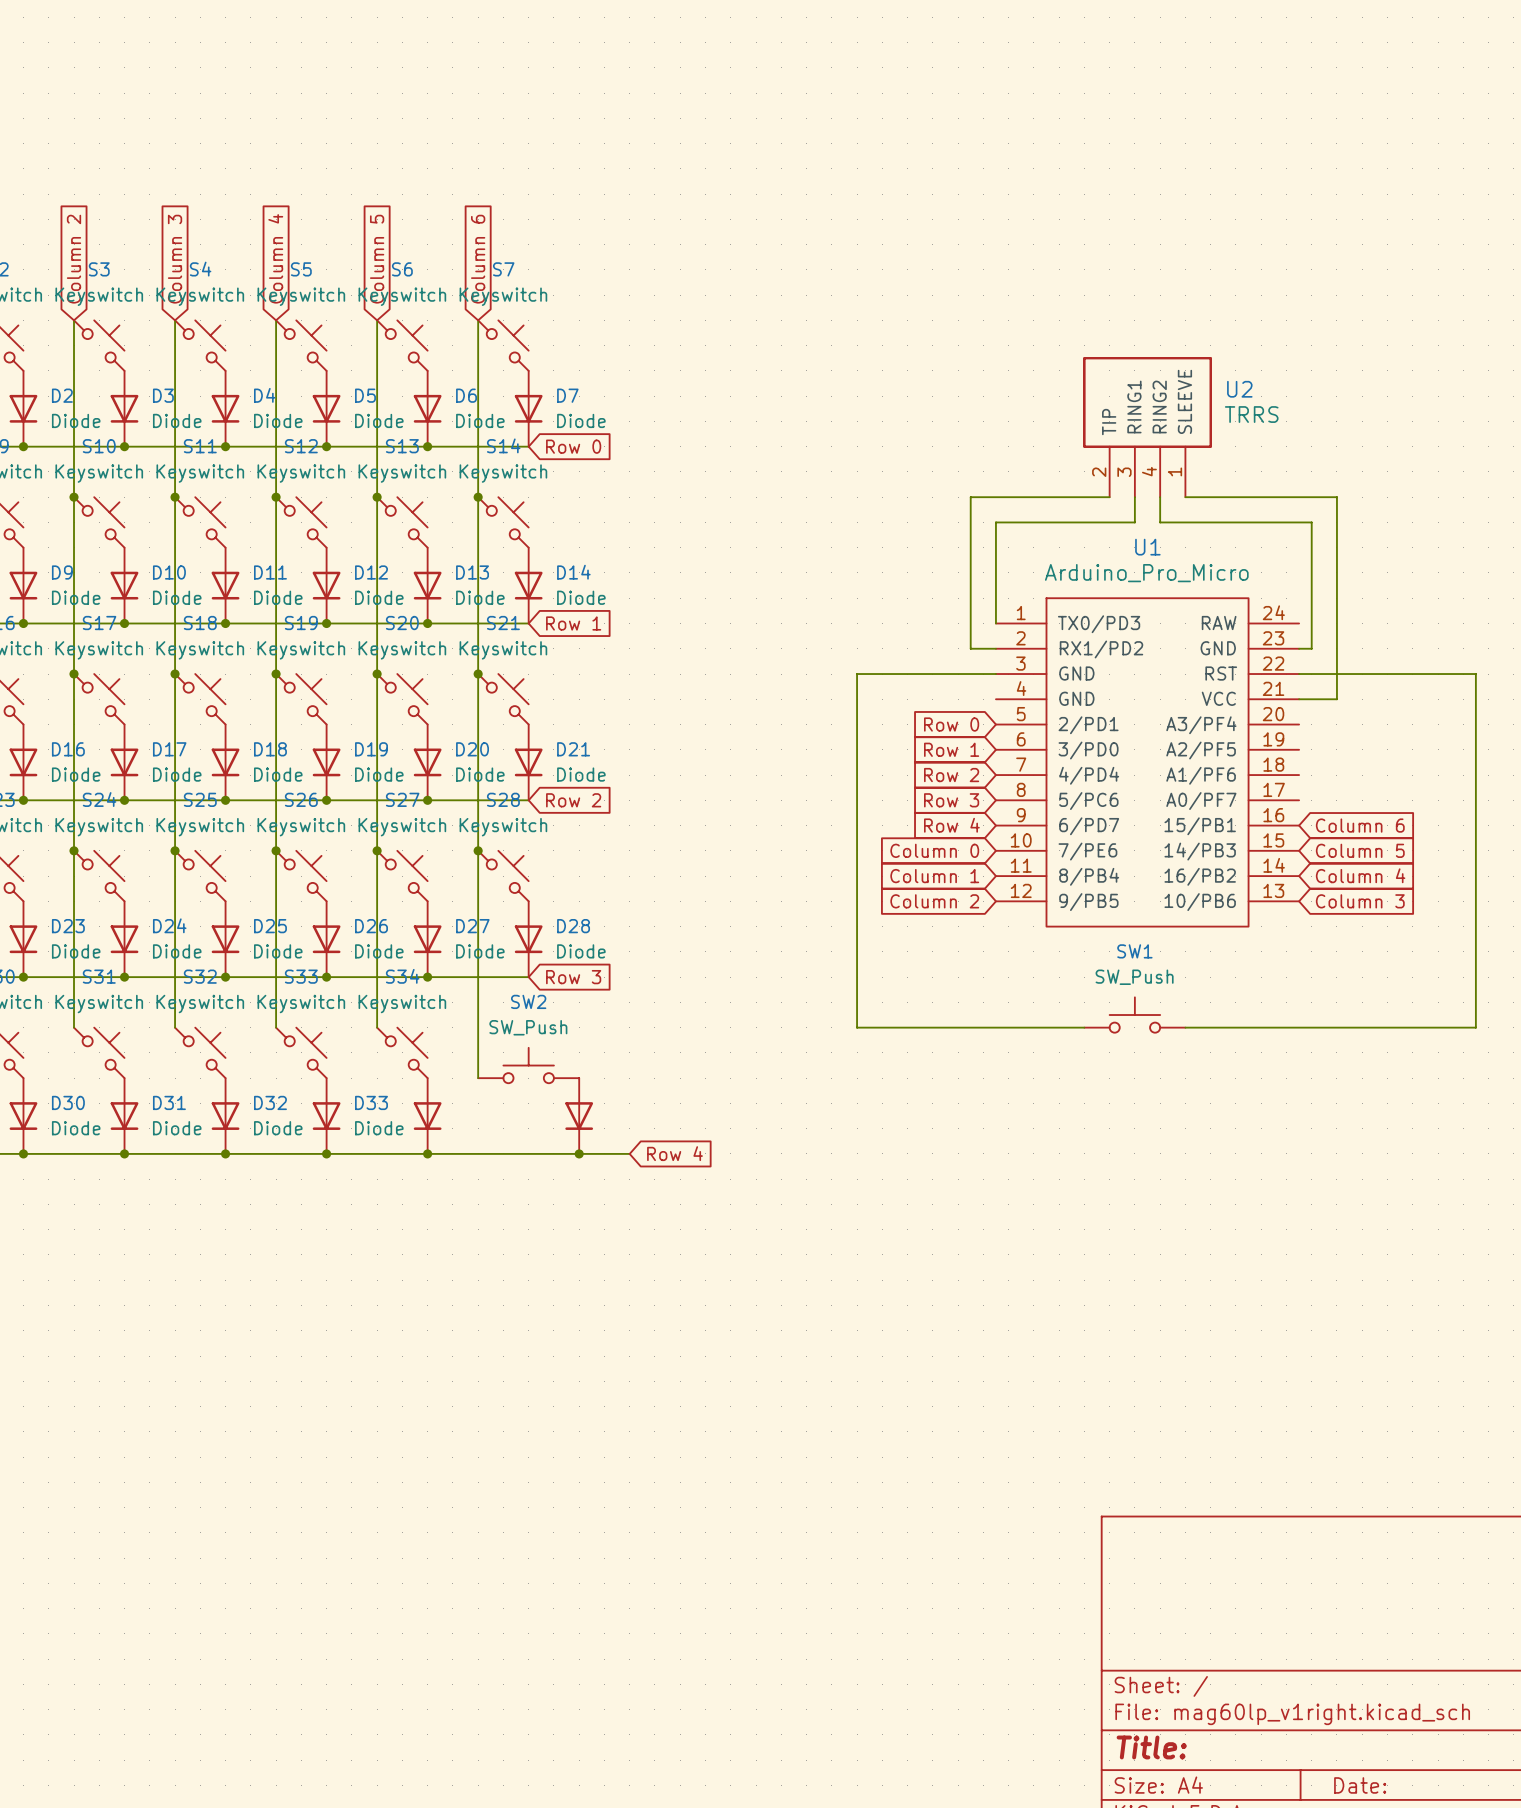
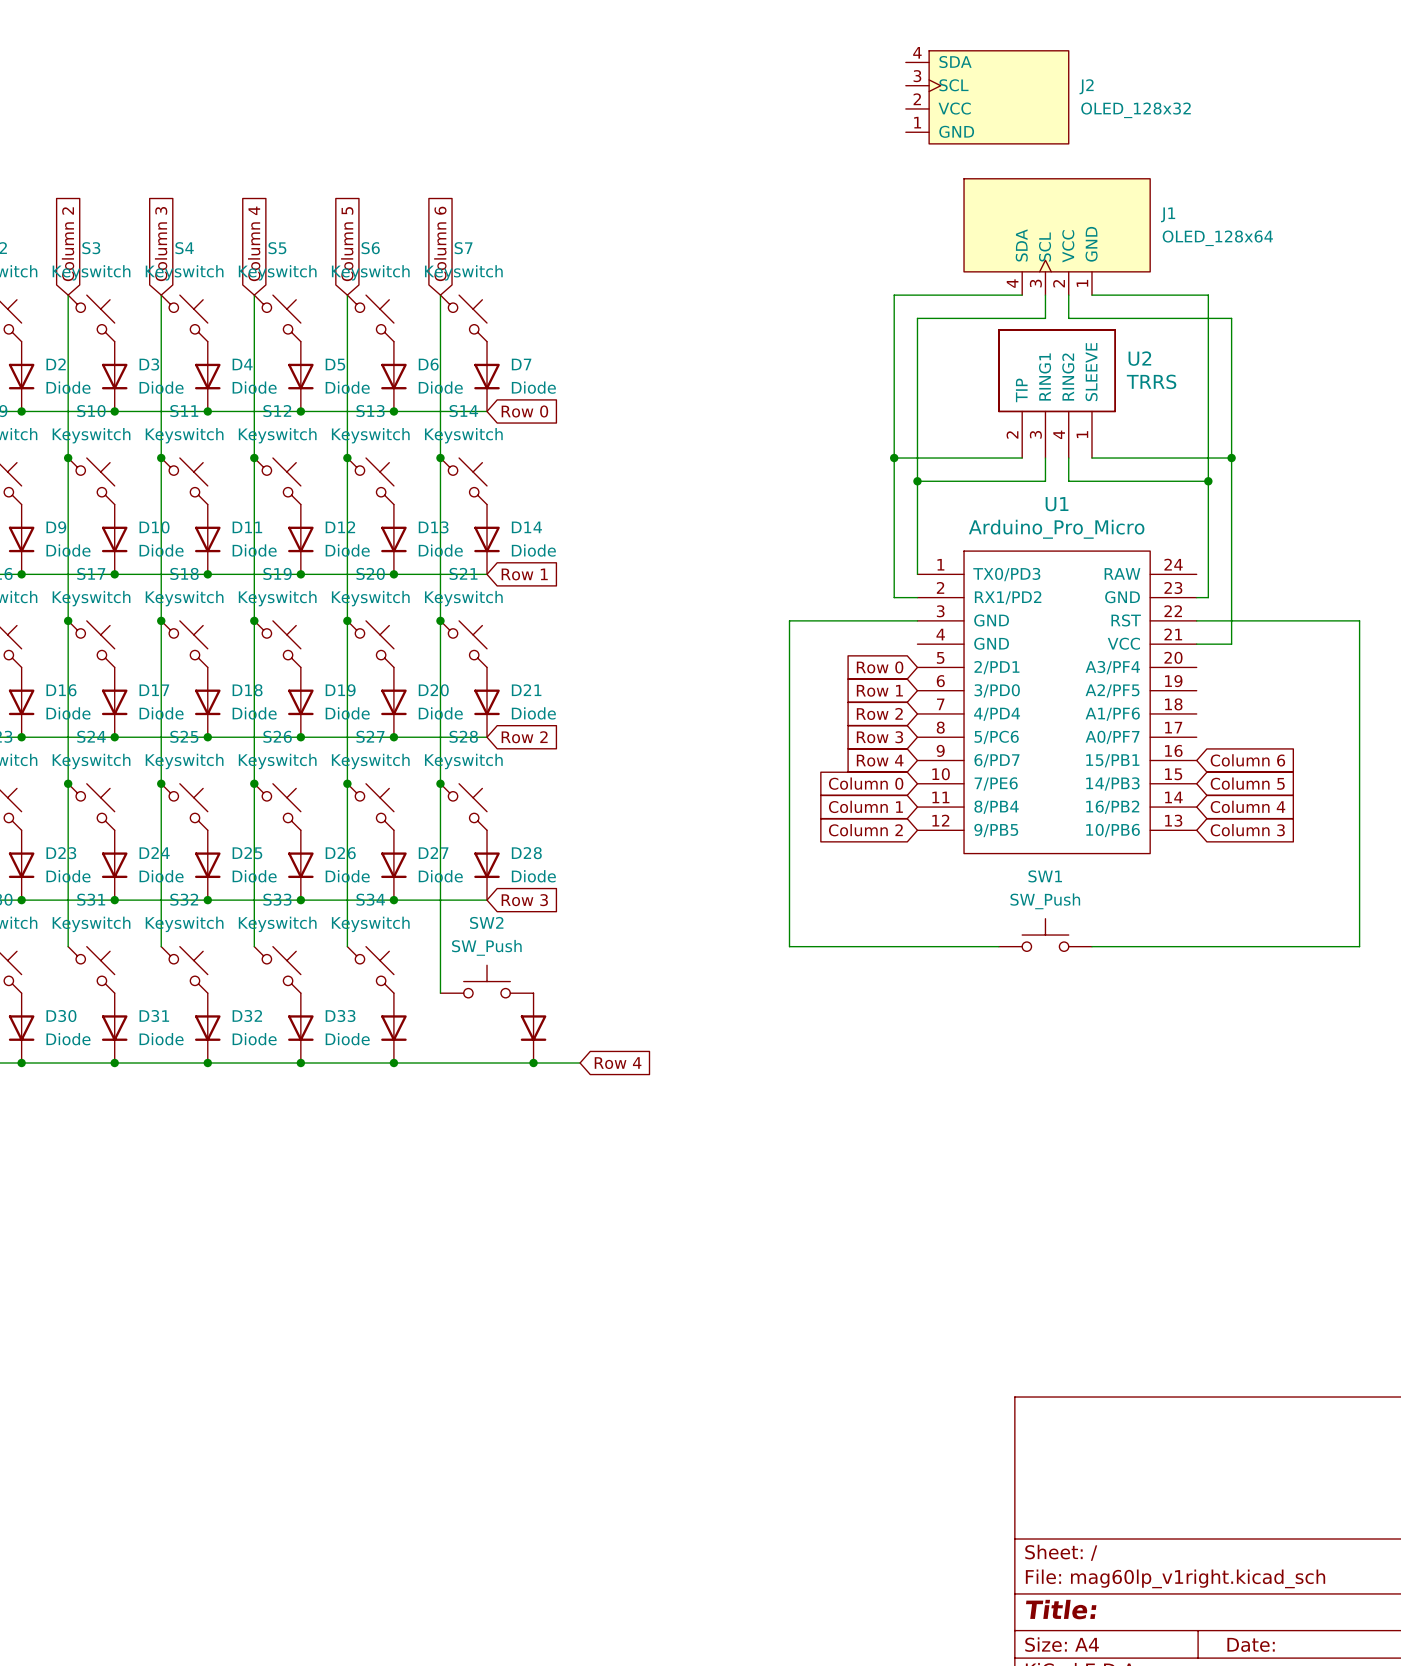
J2: none -> OLED_128x32 (987, 97)
J1: none -> OLED_128x64 (1057, 236)
wire: none -> (1022, 295) (894, 295) (894, 458)
wire: none -> (1045, 295) (1045, 318) (917, 318) (917, 481)
wire: none -> (1068, 295) (1068, 318) (1231, 318) (1231, 458)
wire: none -> (1091, 295) (1208, 295) (1208, 481)
junction: none -> (894, 458)
junction: none -> (1231, 458)
junction: none -> (917, 481)
junction: none -> (1208, 481)

